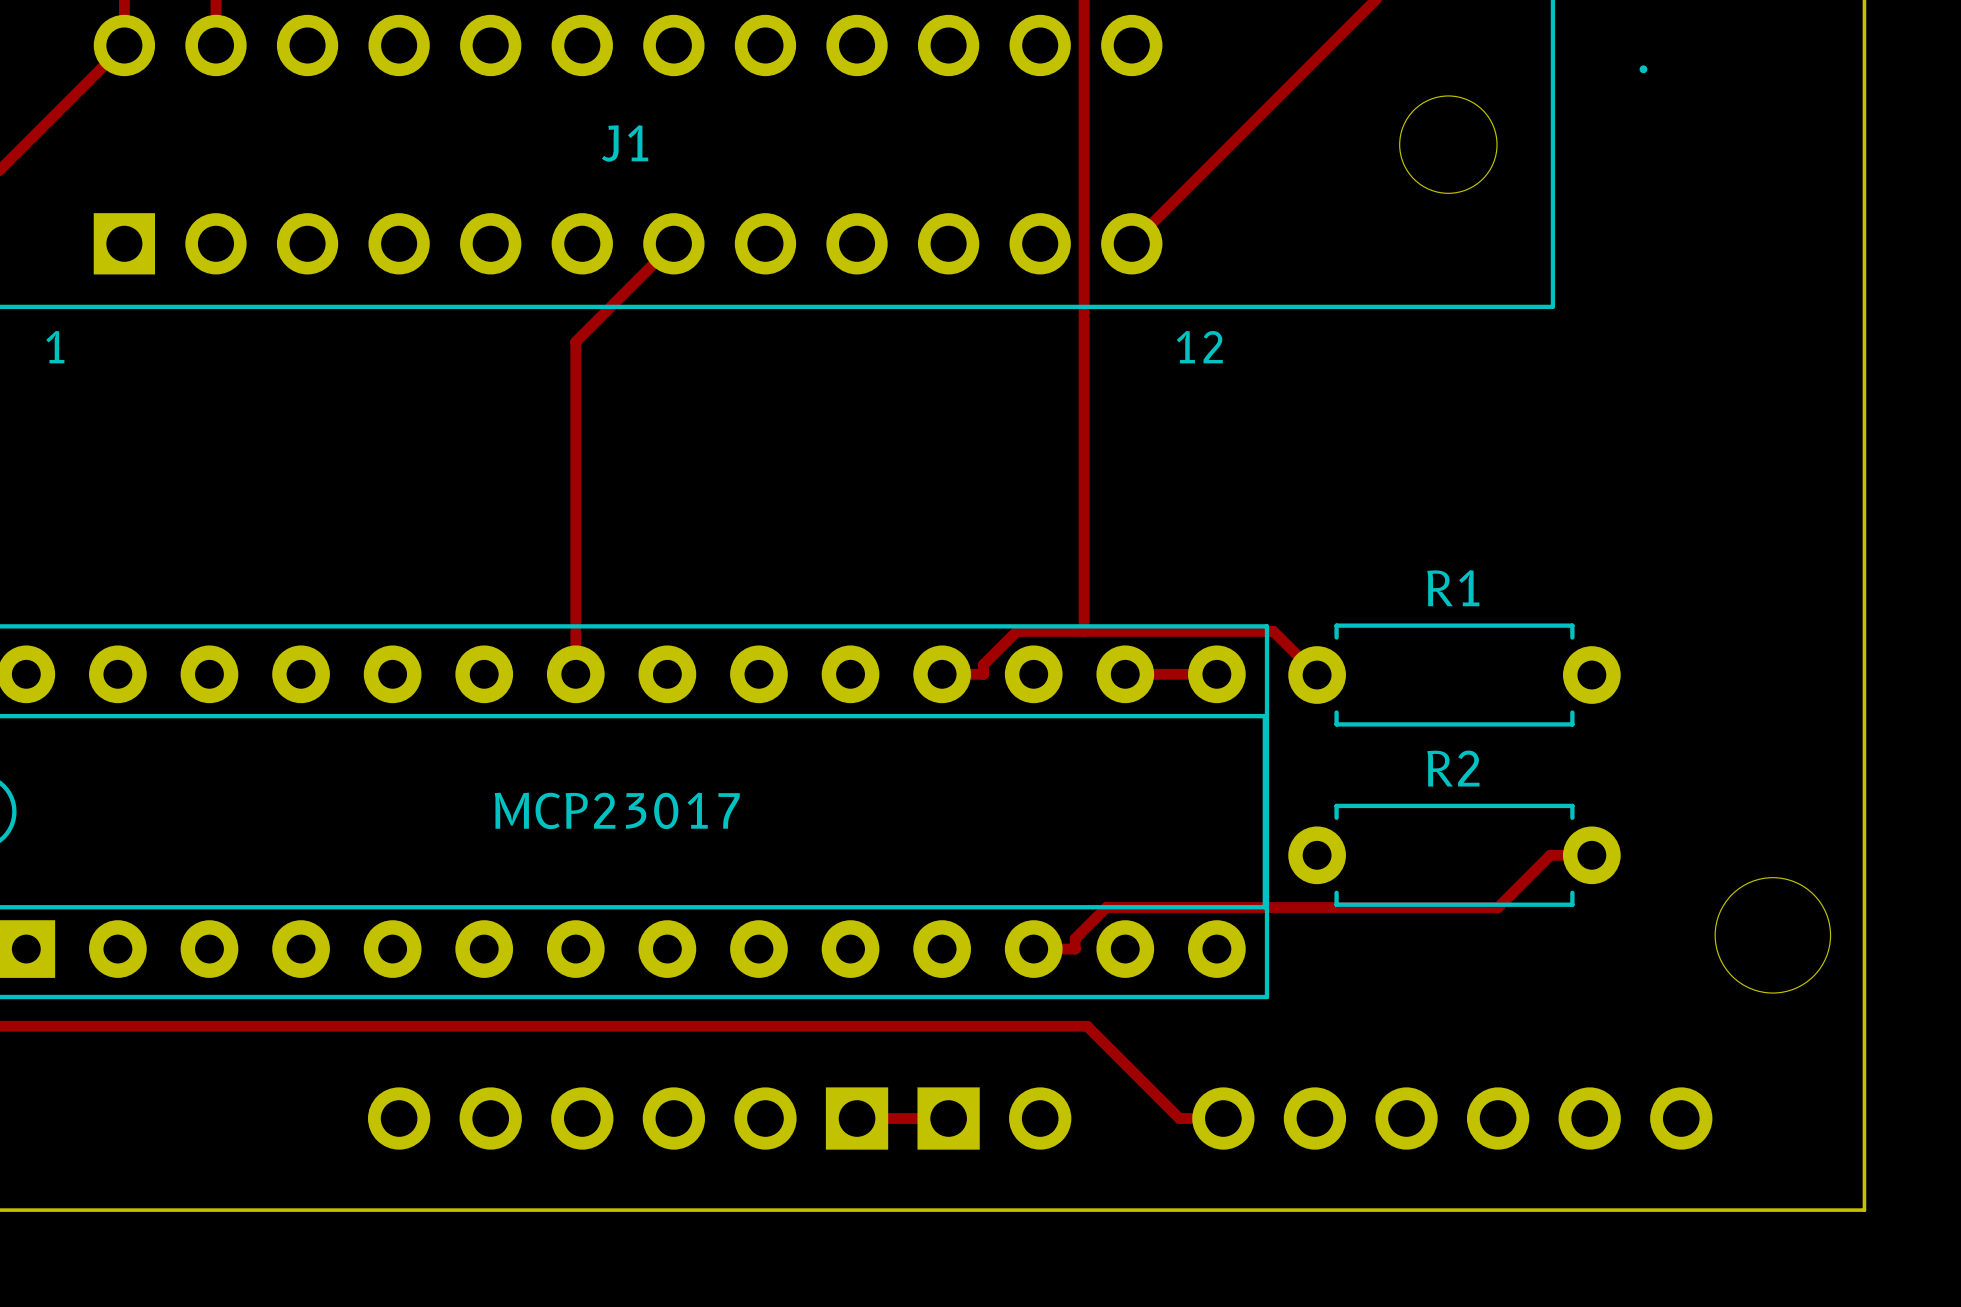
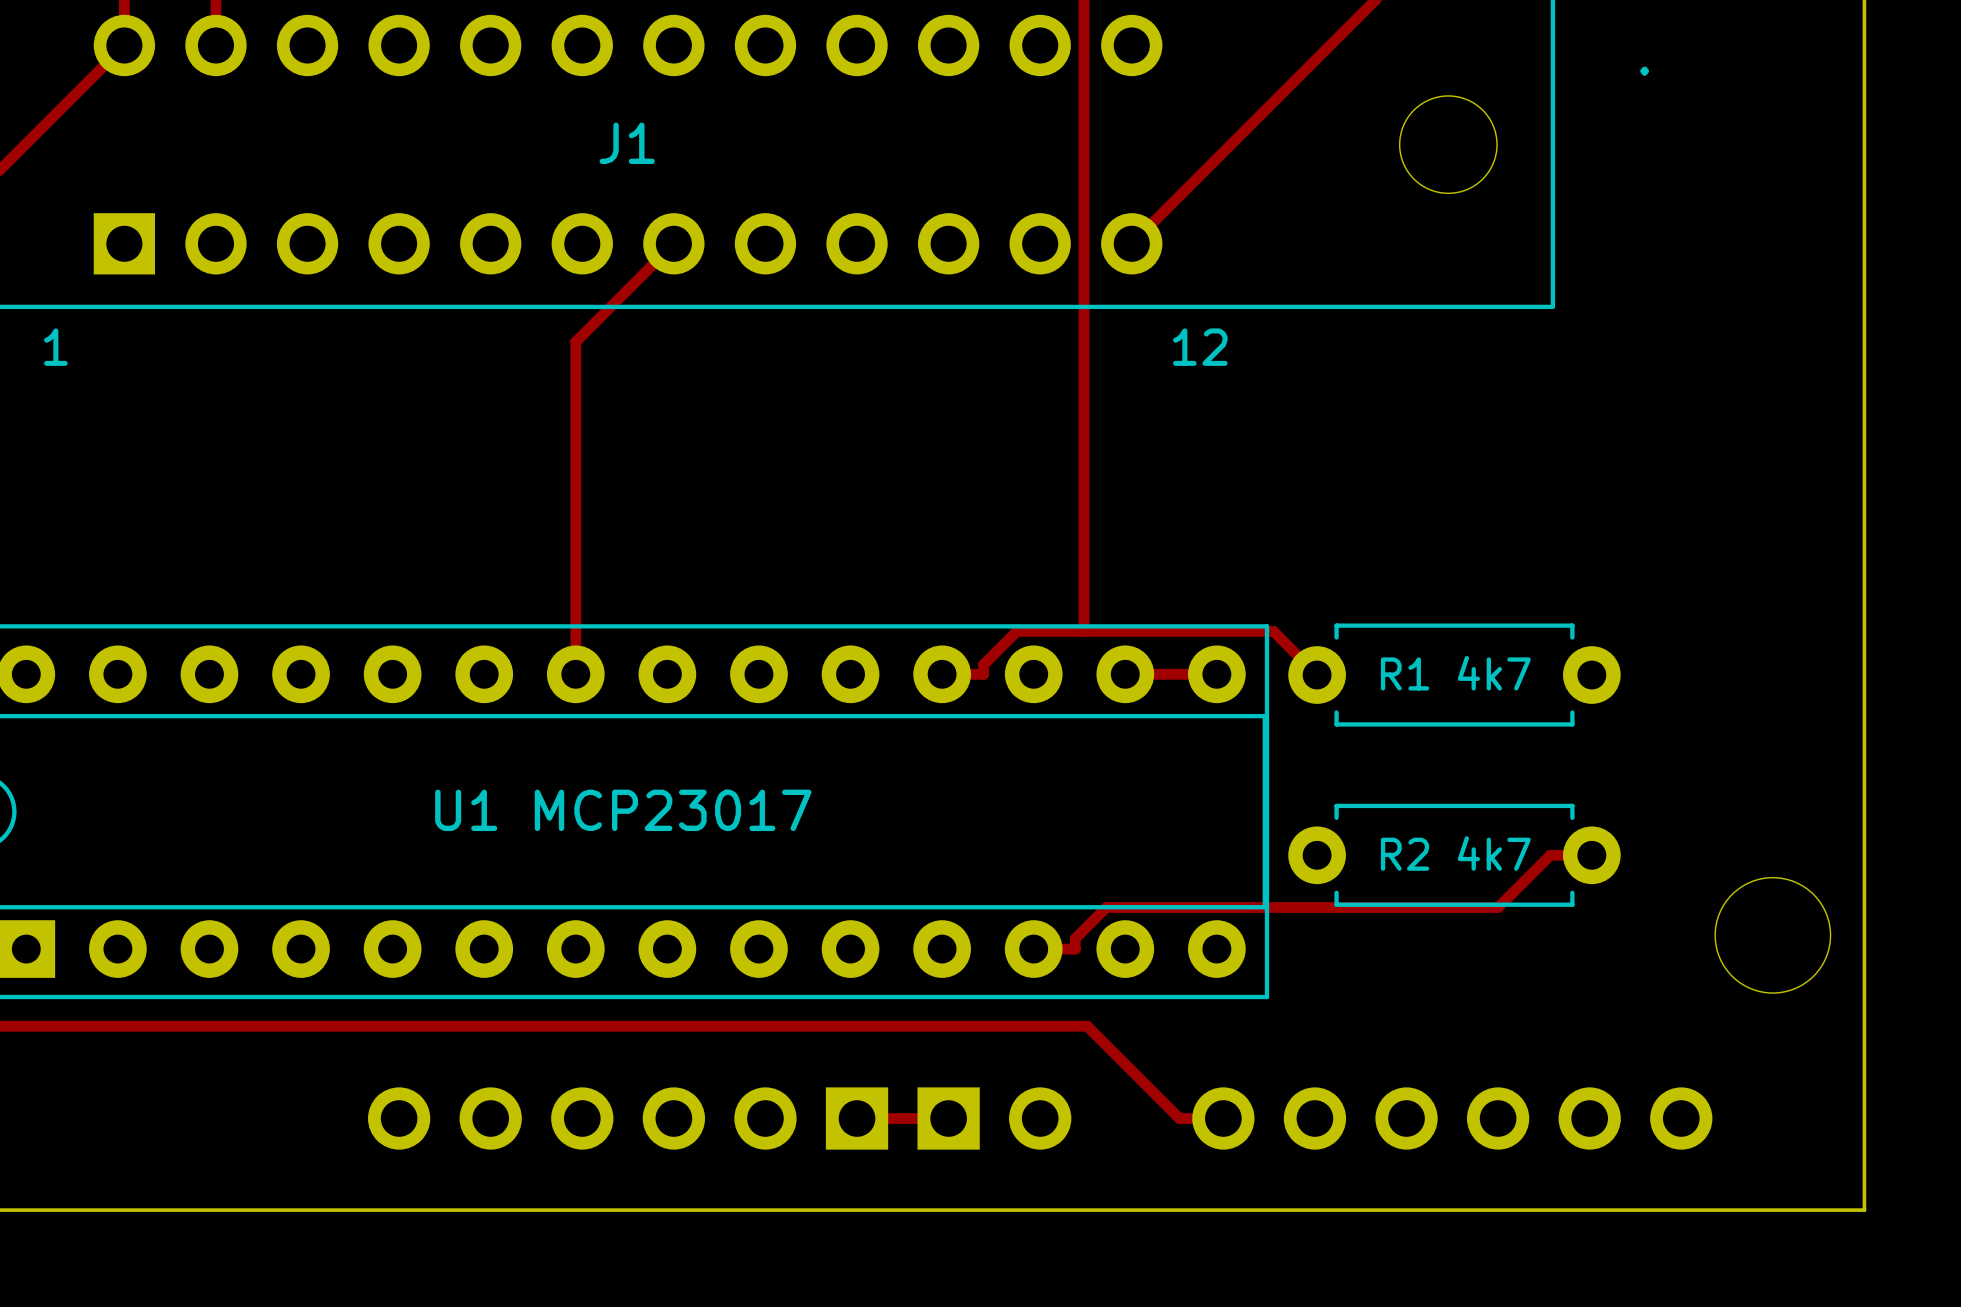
R1 name: R1 (1453, 588) -> none
text: none -> R1 4k7 (1455, 673)
R2 name: R2 (1453, 768) -> none
text: MCP23017 (617, 810) -> U1 MCP23017 (623, 810)
text: none -> R2 4k7 (1455, 853)

